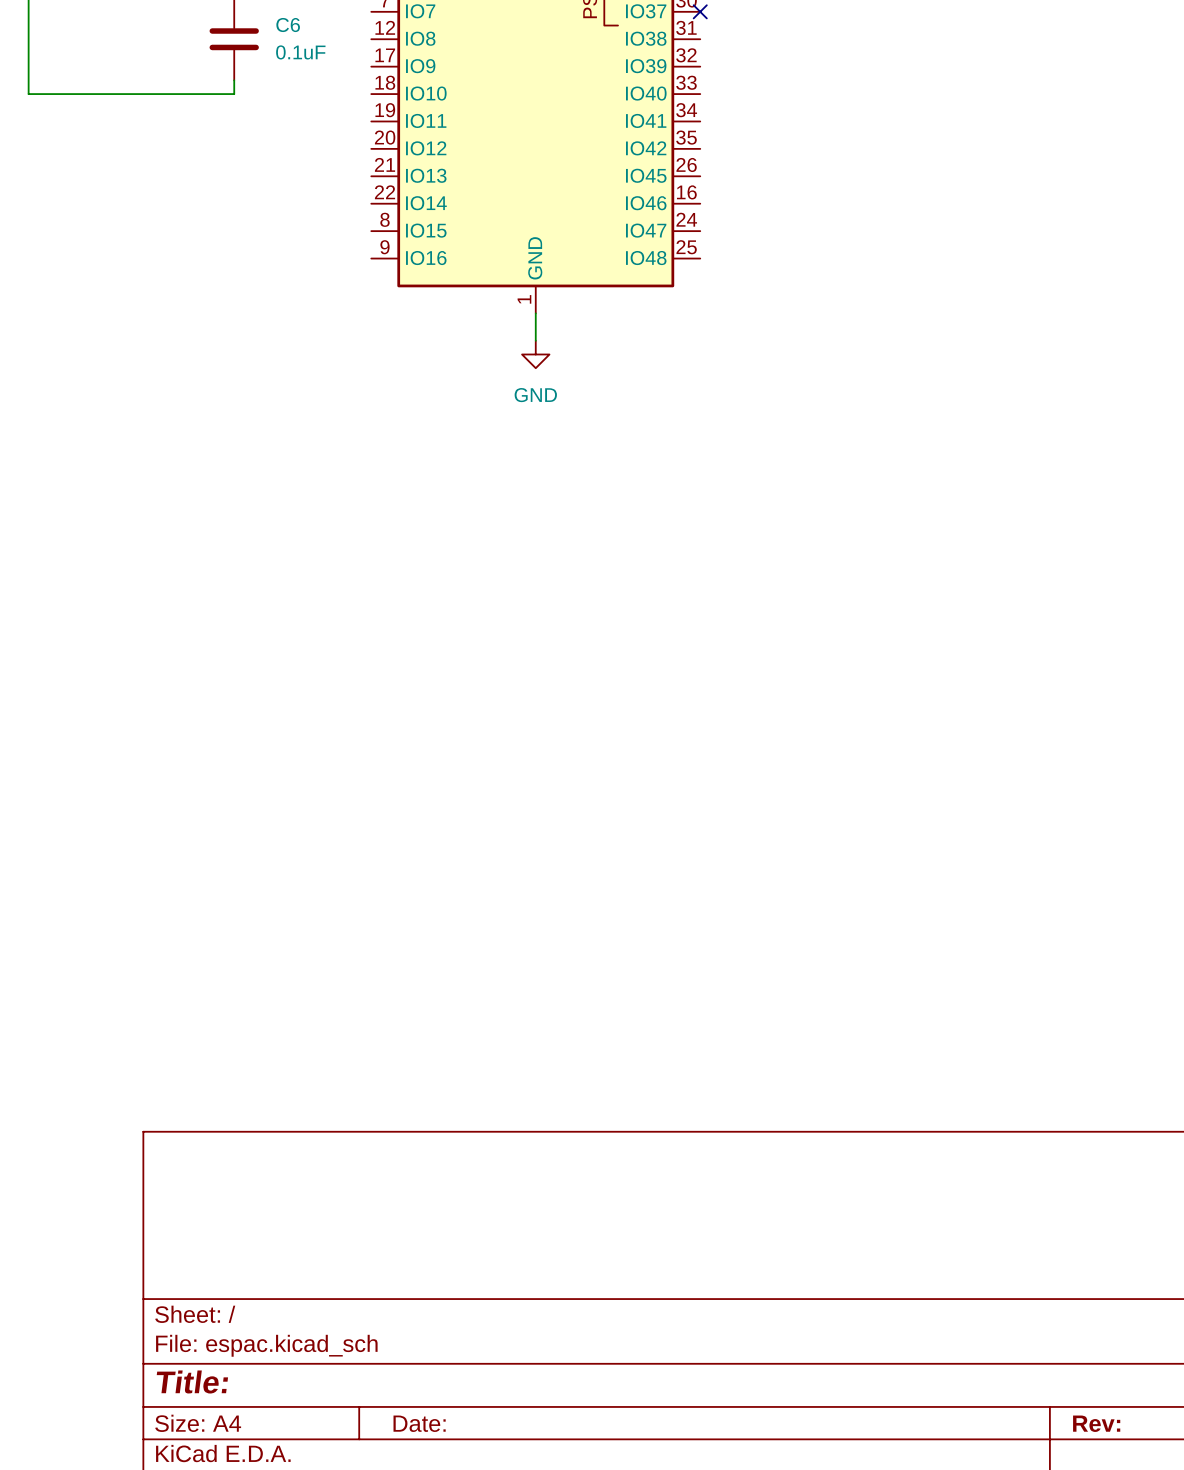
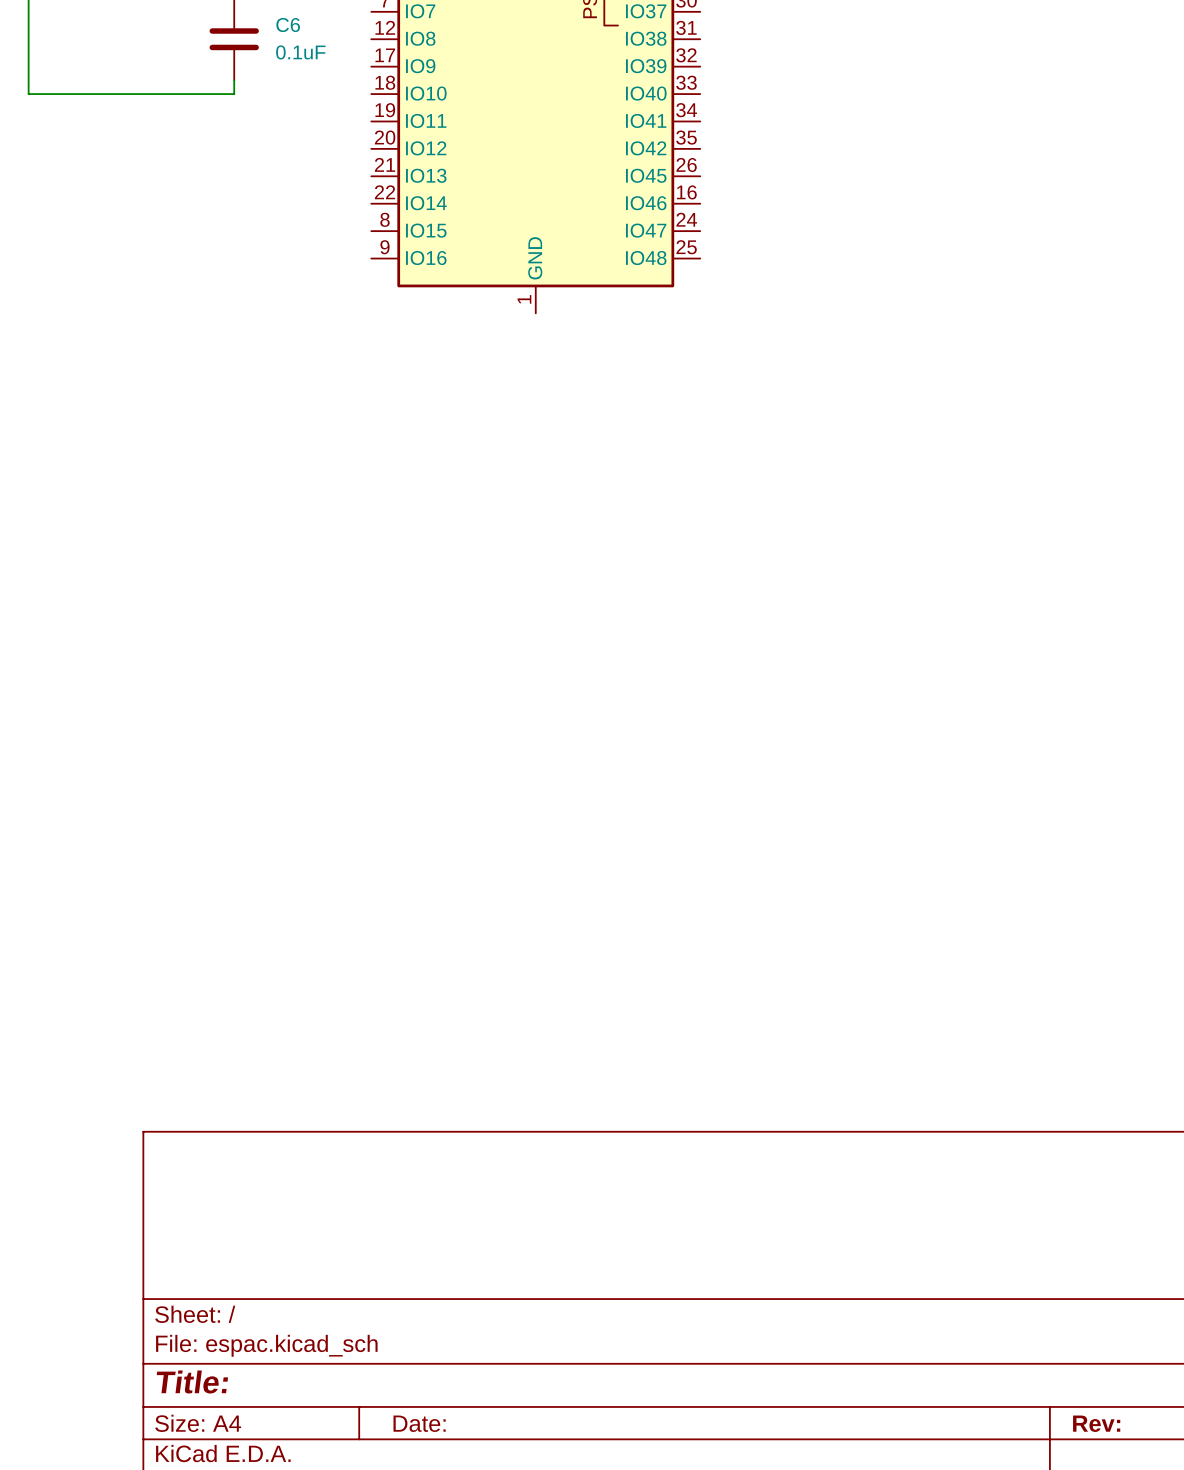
no-connect mark: (700, 11) -> none
wire: (535, 313) (535, 340) -> none
power symbol: GND (535, 354) -> none

